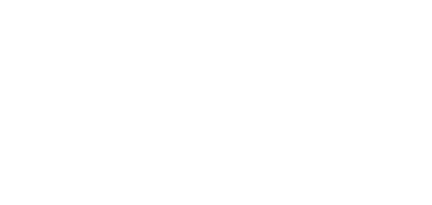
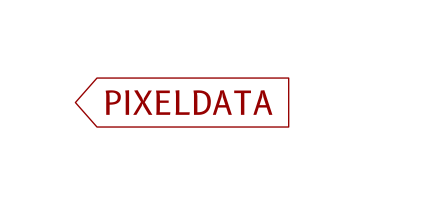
global label: none -> PIXELDATA (189, 102)

